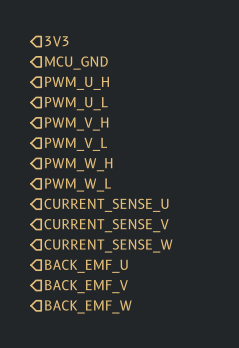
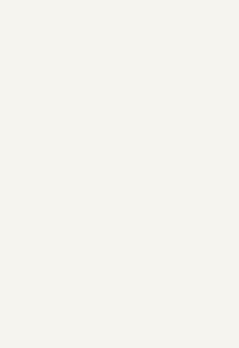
hierarchical label: 3V3 (56, 41) -> none
hierarchical label: MCU_GND (76, 63) -> none
hierarchical label: PWM_U_H (76, 83) -> none
hierarchical label: PWM_U_L (76, 103) -> none
hierarchical label: PWM_V_H (76, 124) -> none
hierarchical label: PWM_V_L (76, 144) -> none
hierarchical label: PWM_W_H (78, 164) -> none
hierarchical label: PWM_W_L (78, 184) -> none
hierarchical label: CURRENT_SENSE_U (106, 205) -> none
hierarchical label: CURRENT_SENSE_V (106, 225) -> none
hierarchical label: CURRENT_SENSE_W (108, 245) -> none
hierarchical label: BACK_EMF_U (86, 266) -> none
hierarchical label: BACK_EMF_V (86, 286) -> none
hierarchical label: BACK_EMF_W (88, 306) -> none

